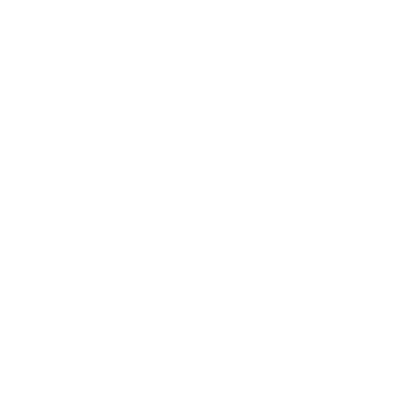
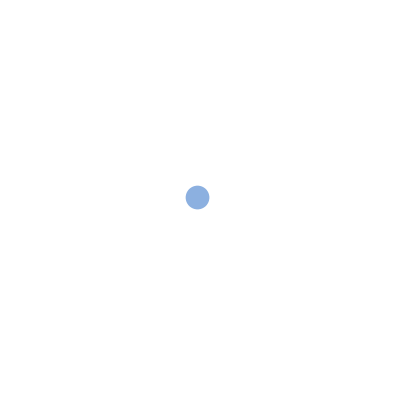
part: none -> (197, 197)

